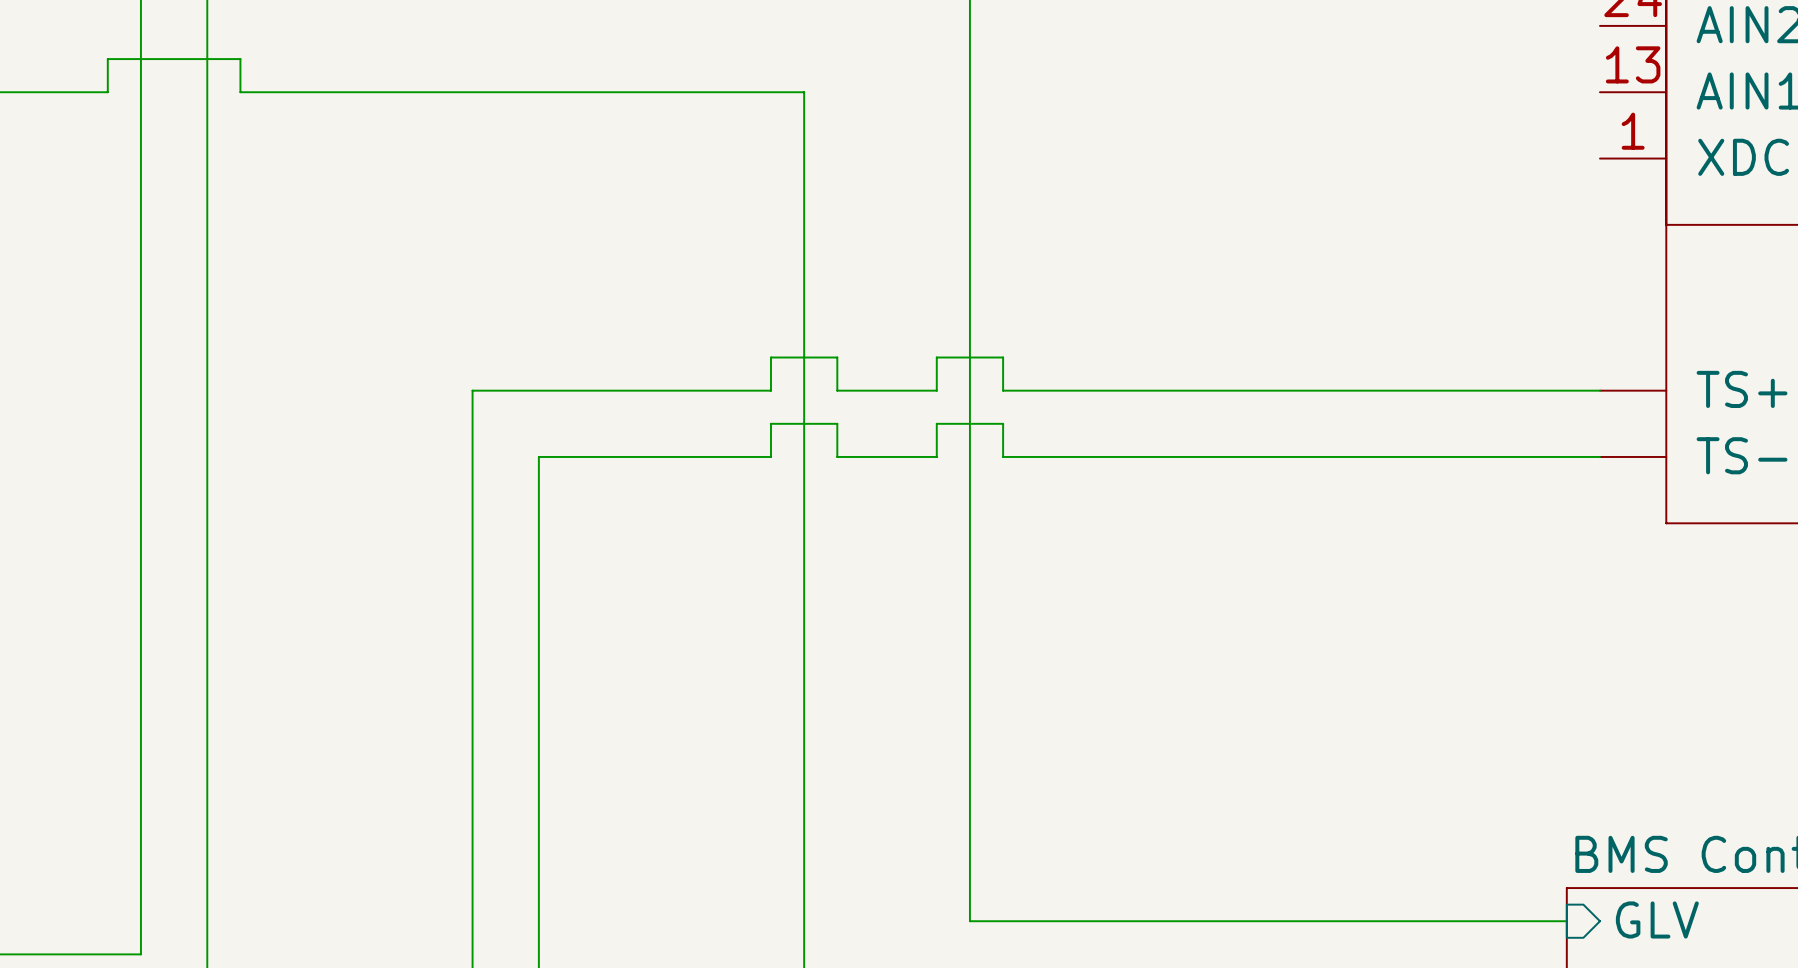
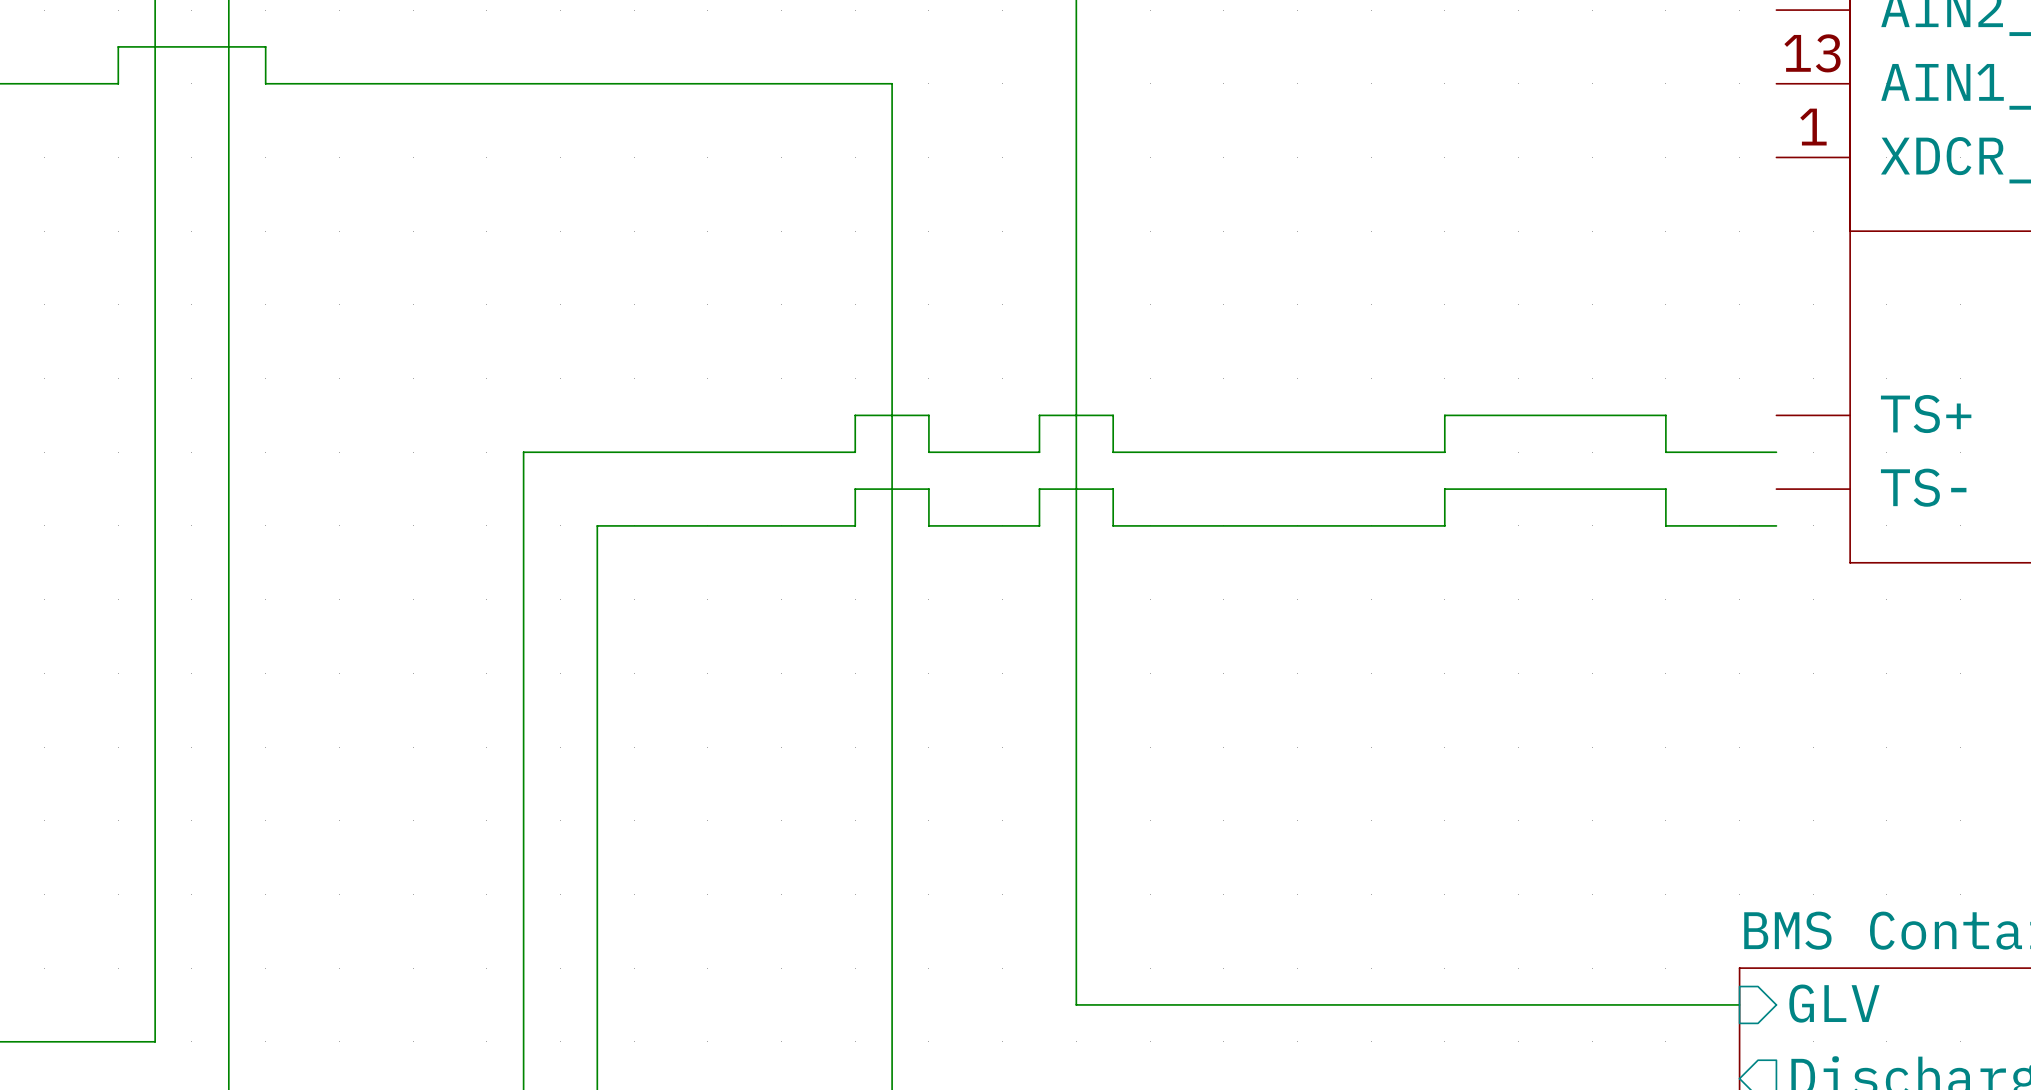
wire: (1301, 390) (1003, 390) (1003, 357) (936, 357) (936, 390) (837, 390) (837, 357) (770, 357) (770, 390) (472, 390) (472, 423) -> (1444, 415) (1444, 452) (1113, 452) (1113, 415) (1039, 415) (1039, 452) (928, 452) (928, 415) (855, 415) (855, 452) (523, 452)
wire: (1500, 390) (1599, 390) -> (1665, 415) (1665, 452) (1776, 452)
wire: (1301, 456) (1003, 456) (1003, 423) (936, 423) (936, 456) (837, 456) (837, 423) (770, 423) (770, 456) (538, 456) (538, 490) -> (1444, 489) (1444, 525) (1113, 525) (1113, 489) (1039, 489) (1039, 525) (928, 525) (928, 489) (855, 489) (855, 525) (597, 525)
wire: (1500, 456) (1599, 456) -> (1665, 489) (1665, 525) (1776, 525)

